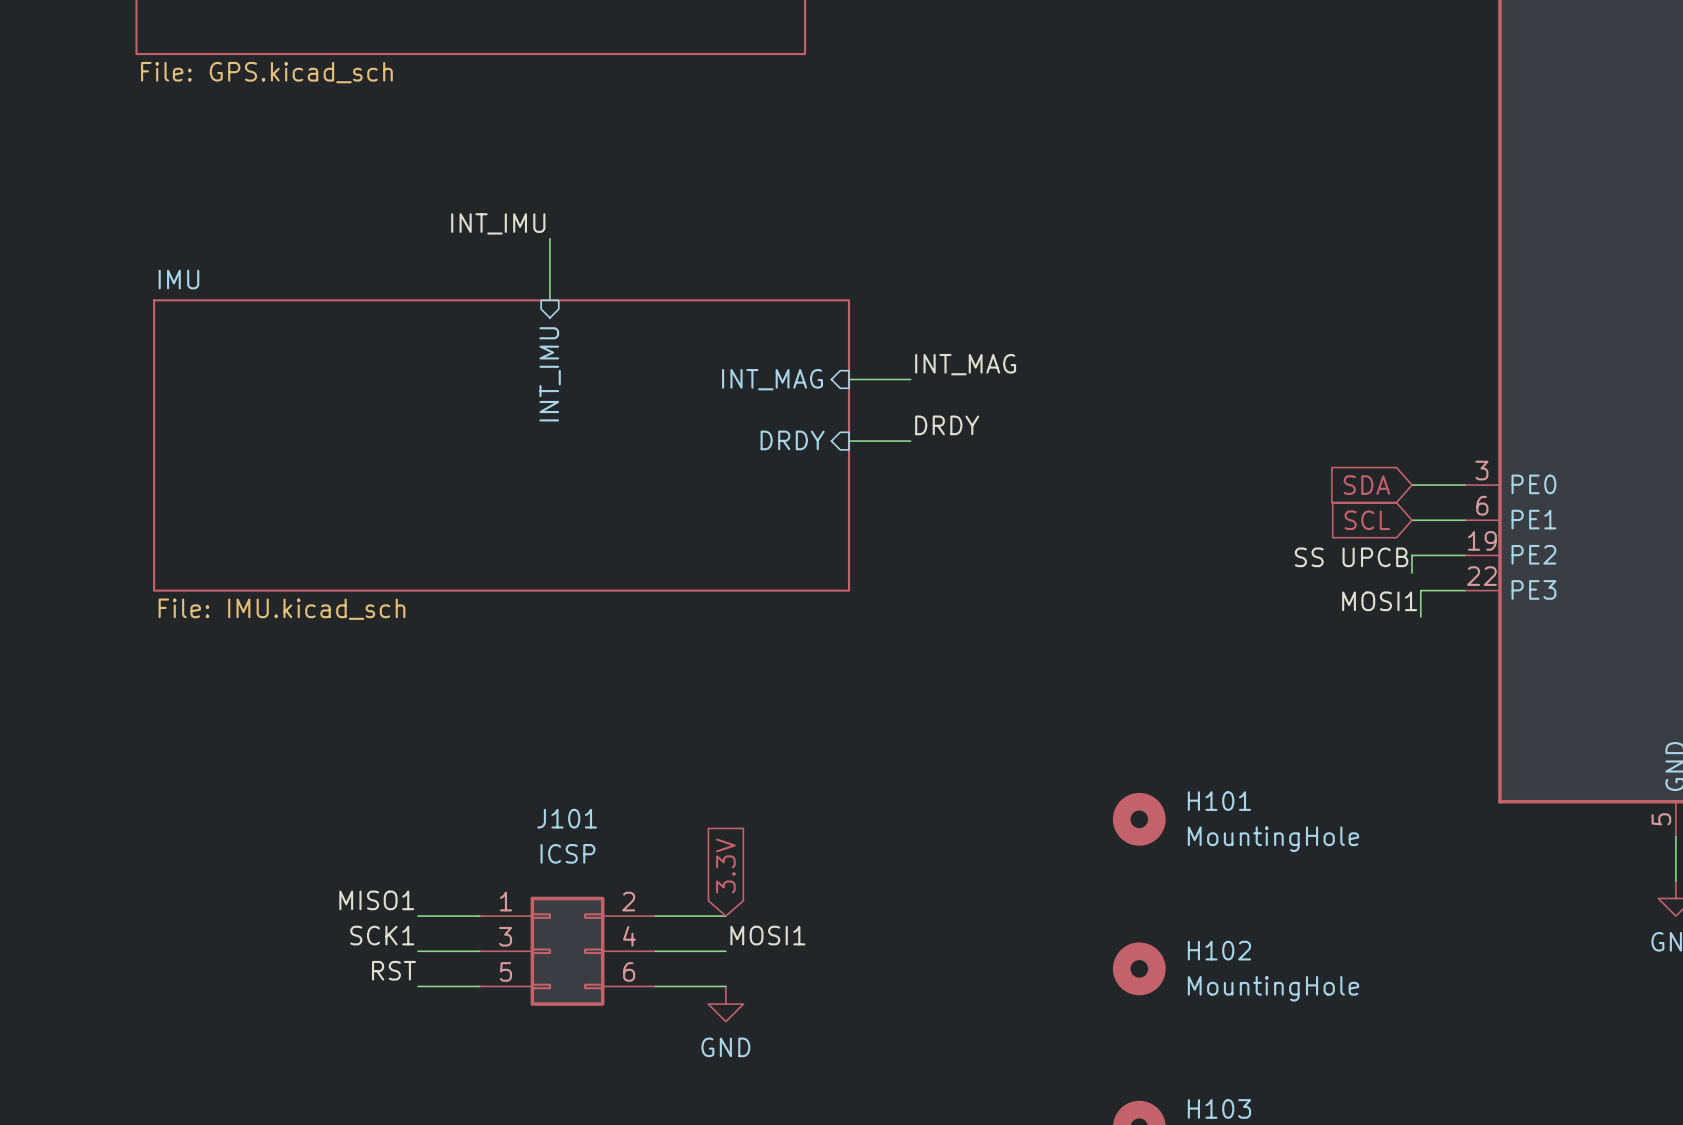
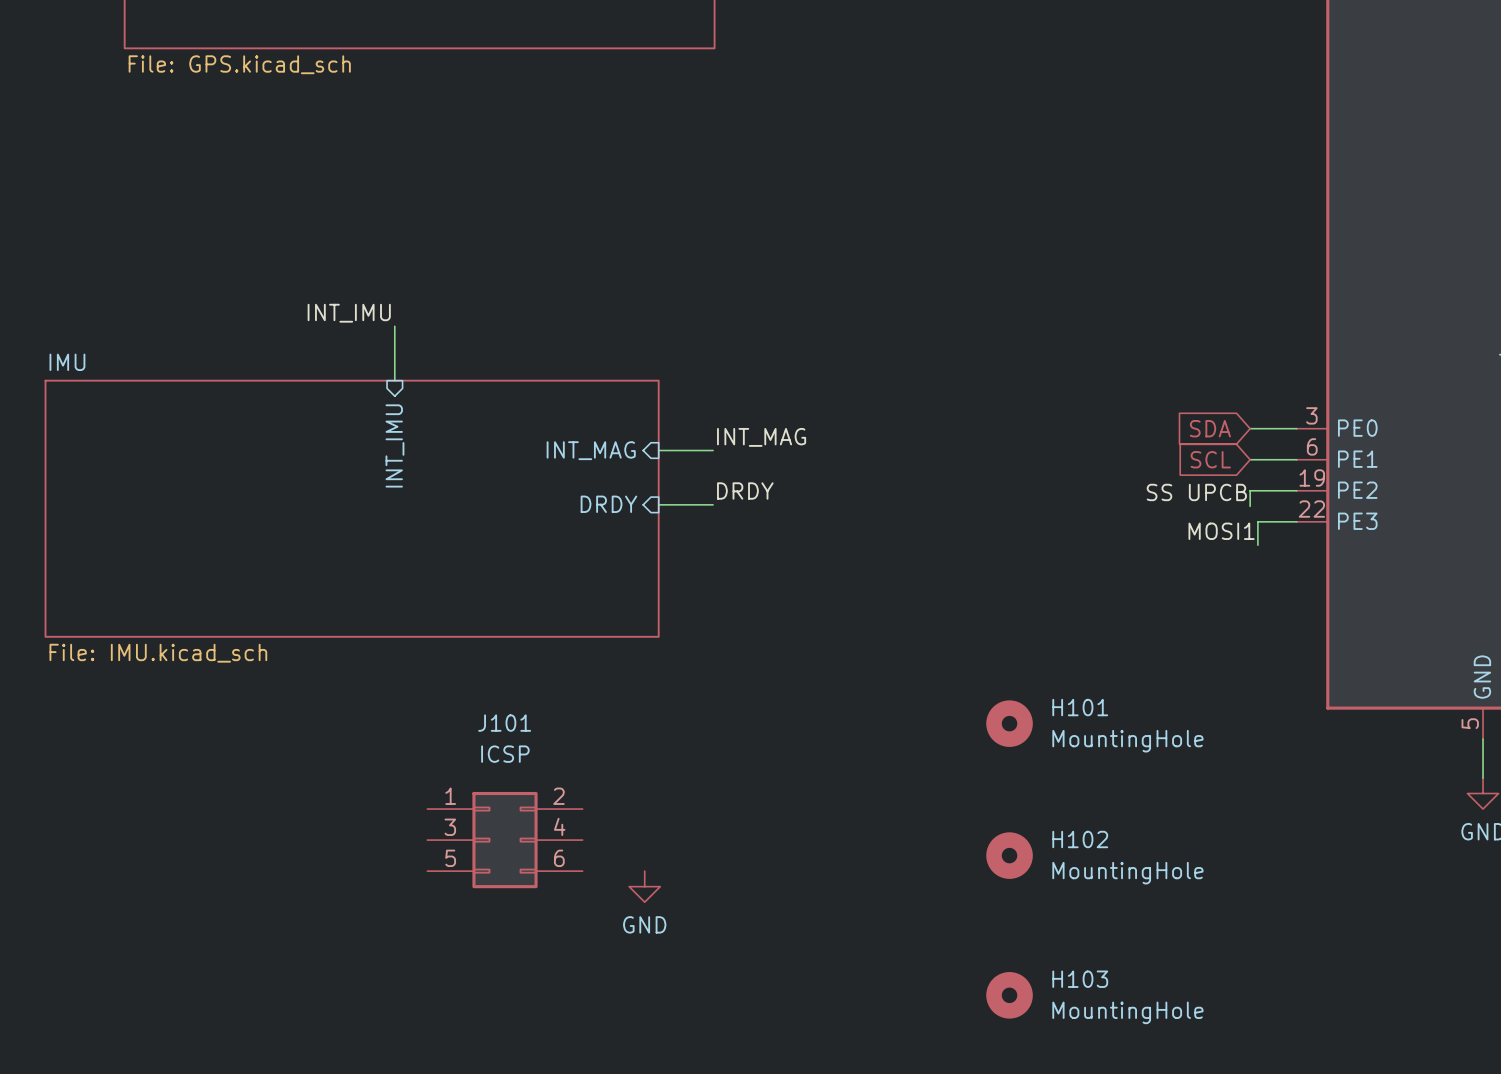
label position: INT_IMU (498, 223) -> INT_IMU (349, 313)
wire: (549, 238) (549, 300) -> (394, 326) (394, 380)
label position: INT_MAG (965, 364) -> INT_MAG (761, 437)
sheet pin position: INT_IMU (550, 374) -> INT_IMU (394, 445)
sheet pin position: INT_MAG (772, 379) -> INT_MAG (591, 450)
wire: (849, 379) (910, 379) -> (658, 450) (713, 450)
label position: DRDY (947, 425) -> DRDY (745, 491)
sheet pin position: DRDY (792, 440) -> DRDY (608, 504)
wire: (849, 441) (910, 441) -> (658, 504) (713, 504)
sheet IMU position: (501, 445) -> (352, 508)
global label: 3.3V (725, 866) -> none
label: MISO1 (376, 900) -> none
wire: (418, 916) (479, 916) -> none
wire: (655, 916) (725, 916) -> none
label: SCK1 (382, 935) -> none
label: MOSI1 (767, 935) -> none
wire: (418, 951) (479, 951) -> none
wire: (655, 951) (725, 951) -> none
label: RST (393, 970) -> none
wire: (418, 986) (479, 986) -> none
wire: (655, 986) (725, 986) -> none

